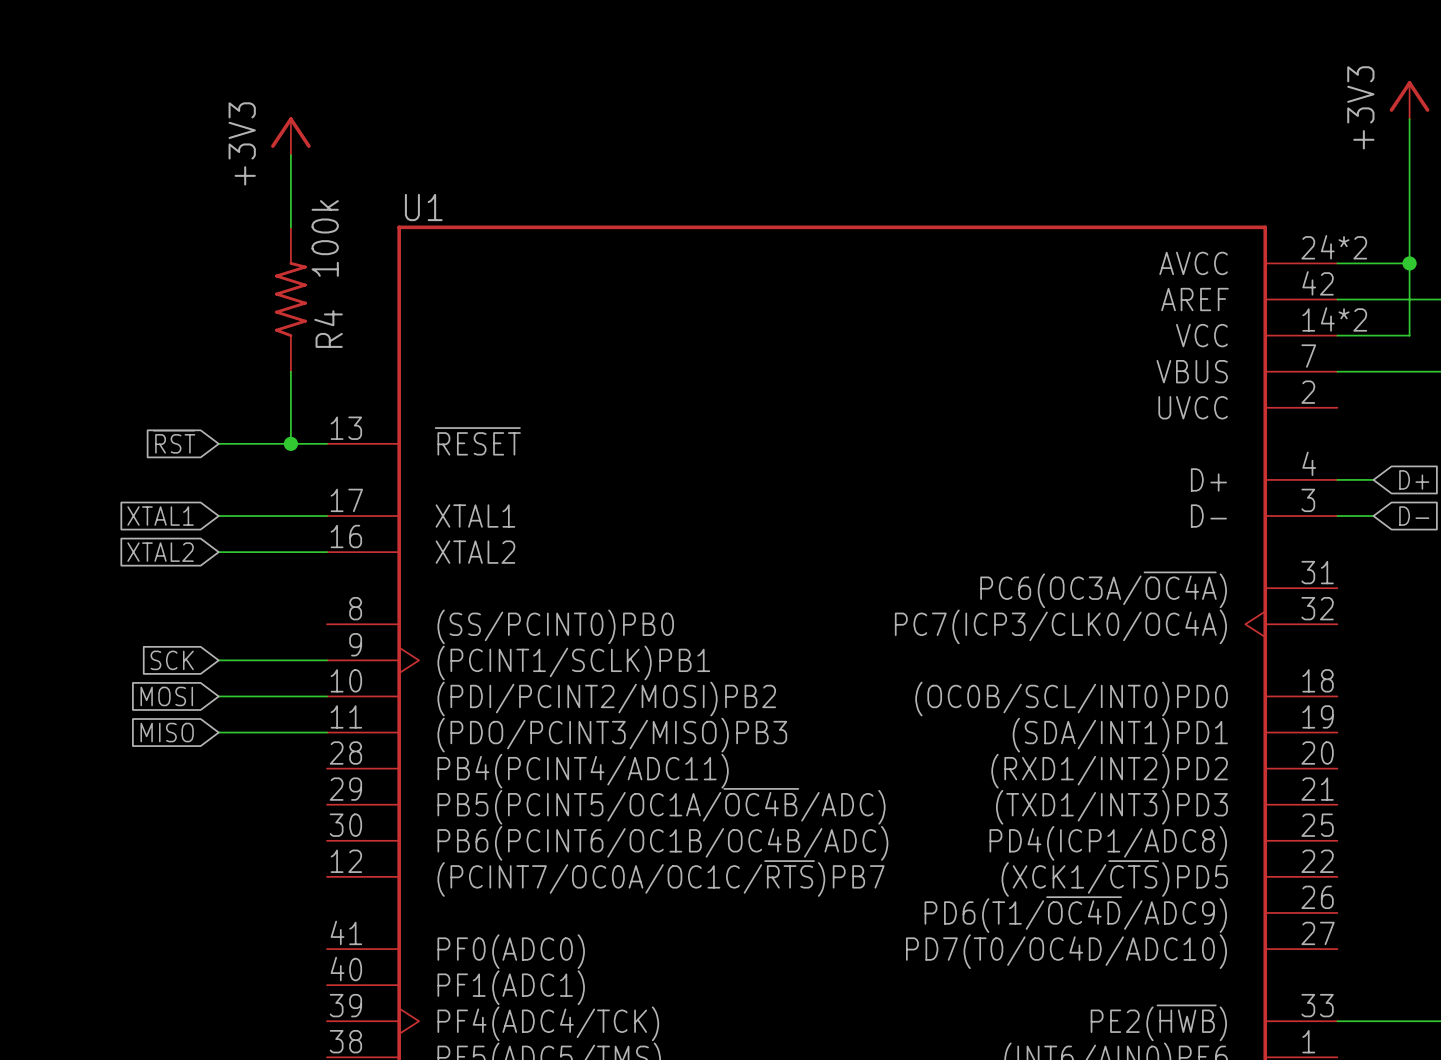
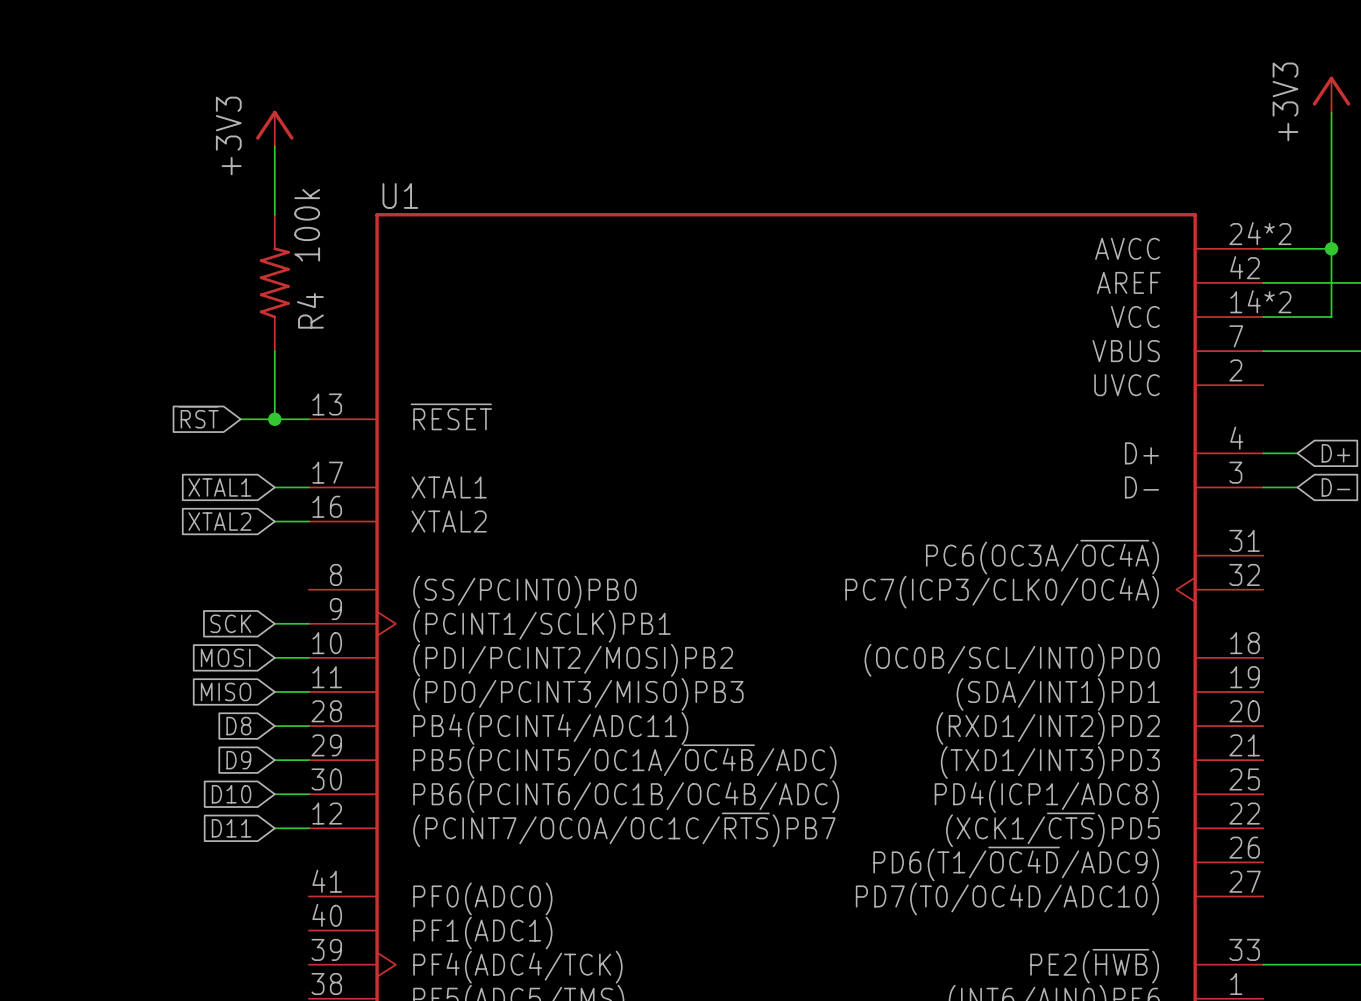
global label position: ~{RST} (174, 441) -> ~{RST} (198, 417)
wire: (218, 443) (254, 443) -> (274, 726) (308, 726)
global label position: XTAL1 (160, 516) -> XTAL1 (219, 487)
wire: (218, 516) (290, 516) -> none
global label position: XTAL2 (160, 552) -> XTAL2 (219, 521)
wire: (218, 552) (290, 552) -> none
global label position: SCK (172, 660) -> SCK (230, 623)
wire: (218, 660) (290, 660) -> none
global label position: MOSI (166, 696) -> MOSI (225, 657)
wire: (218, 696) (290, 696) -> none
global label position: MISO (167, 732) -> MISO (226, 691)
wire: (218, 732) (290, 732) -> none
global label: none -> D8 (238, 726)
global label: none -> D9 (238, 760)
wire: none -> (274, 760) (308, 760)
global label: none -> D10 (231, 794)
wire: none -> (274, 794) (308, 794)
global label: none -> D11 (231, 828)
wire: none -> (274, 828) (308, 828)

